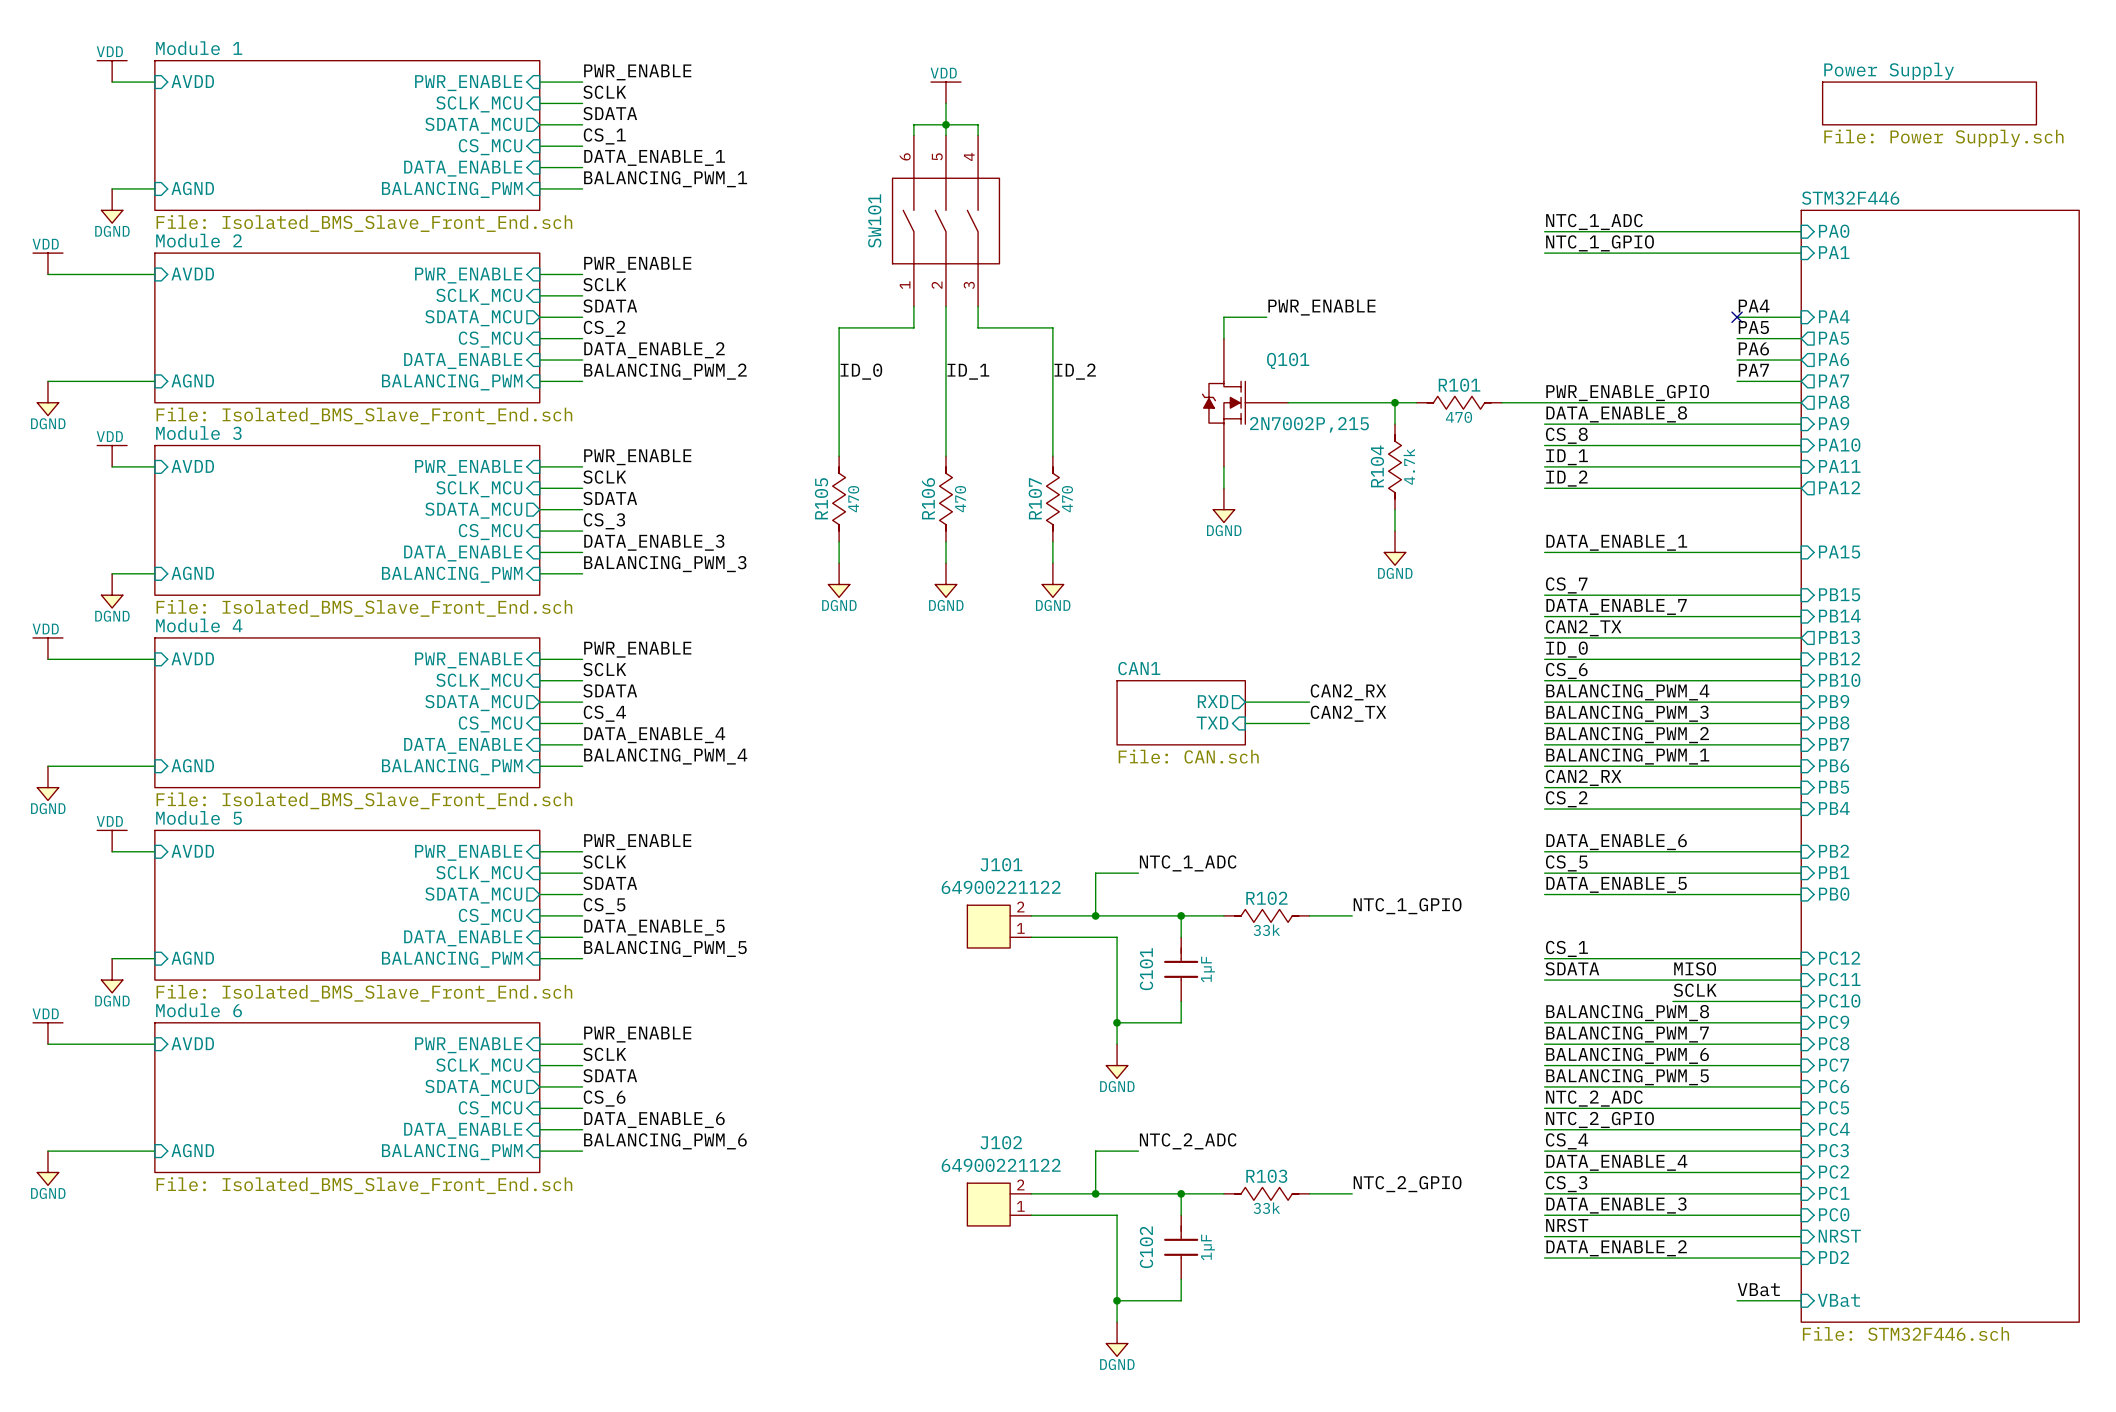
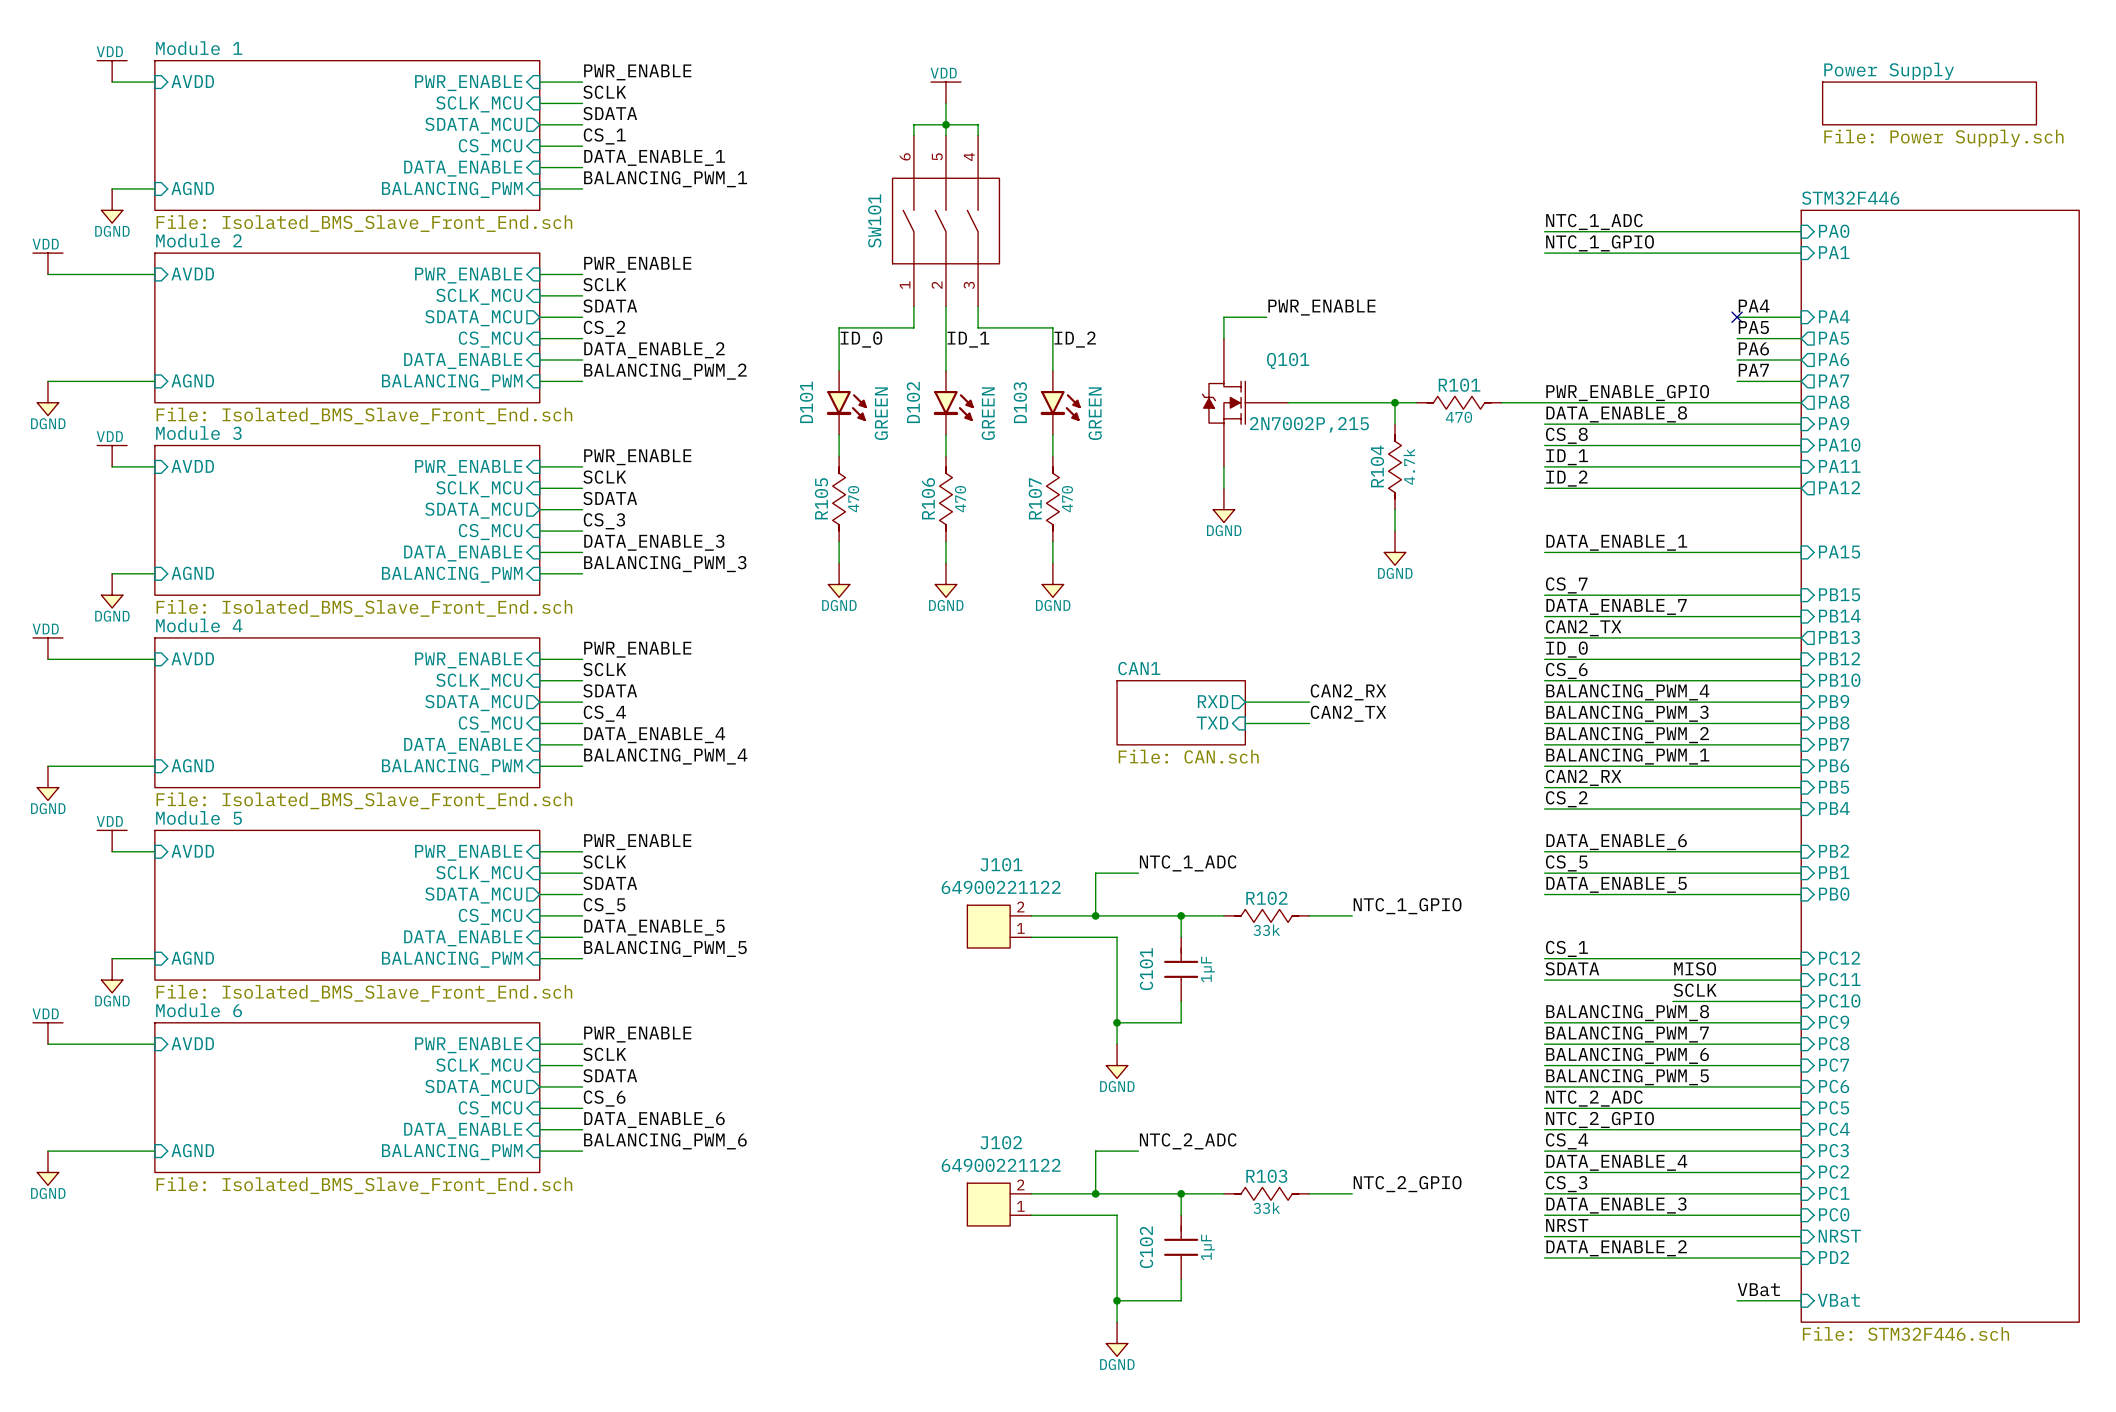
label position: ID_0 (861, 371) -> ID_0 (861, 339)
label position: ID_1 (968, 371) -> ID_1 (968, 339)
label position: ID_2 (1075, 371) -> ID_2 (1075, 339)
D101: none -> (846, 402)
D102: none -> (953, 402)
D103: none -> (1060, 402)

